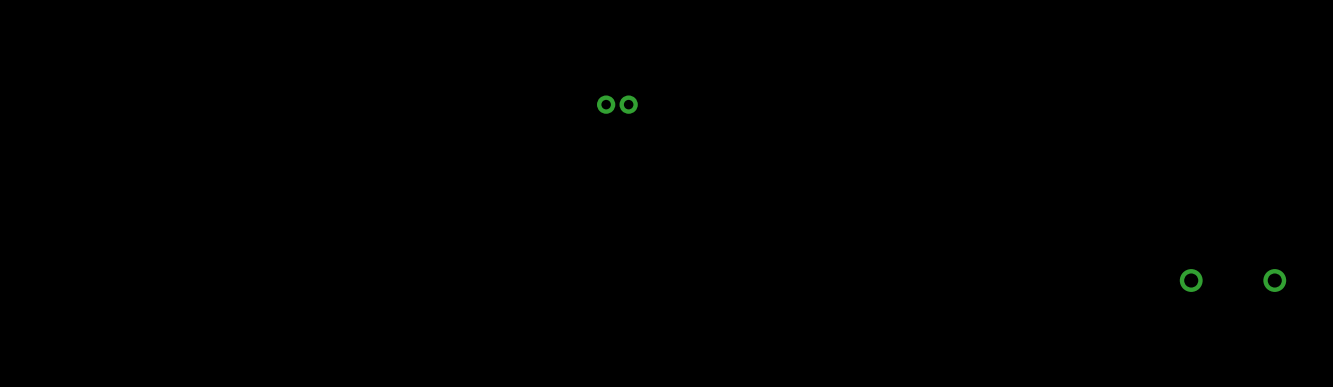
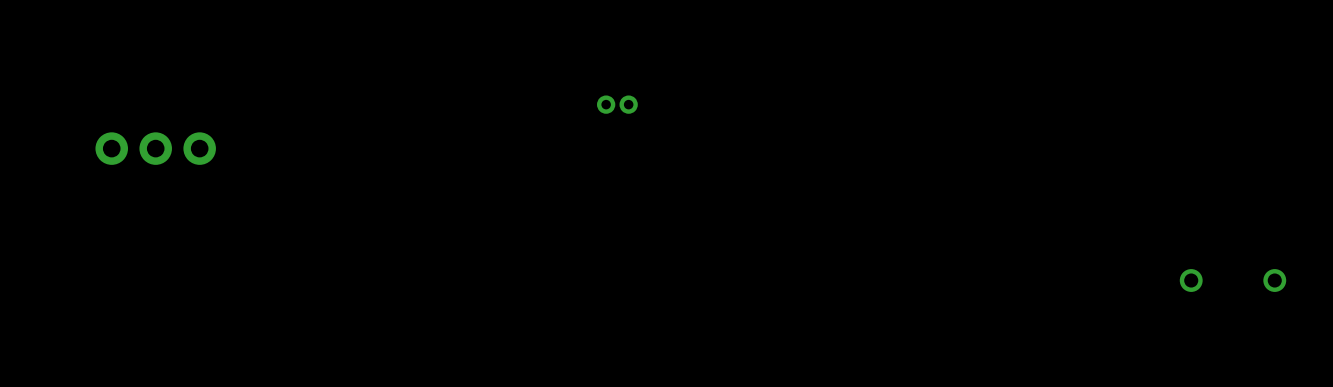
part: none -> (155, 148)

